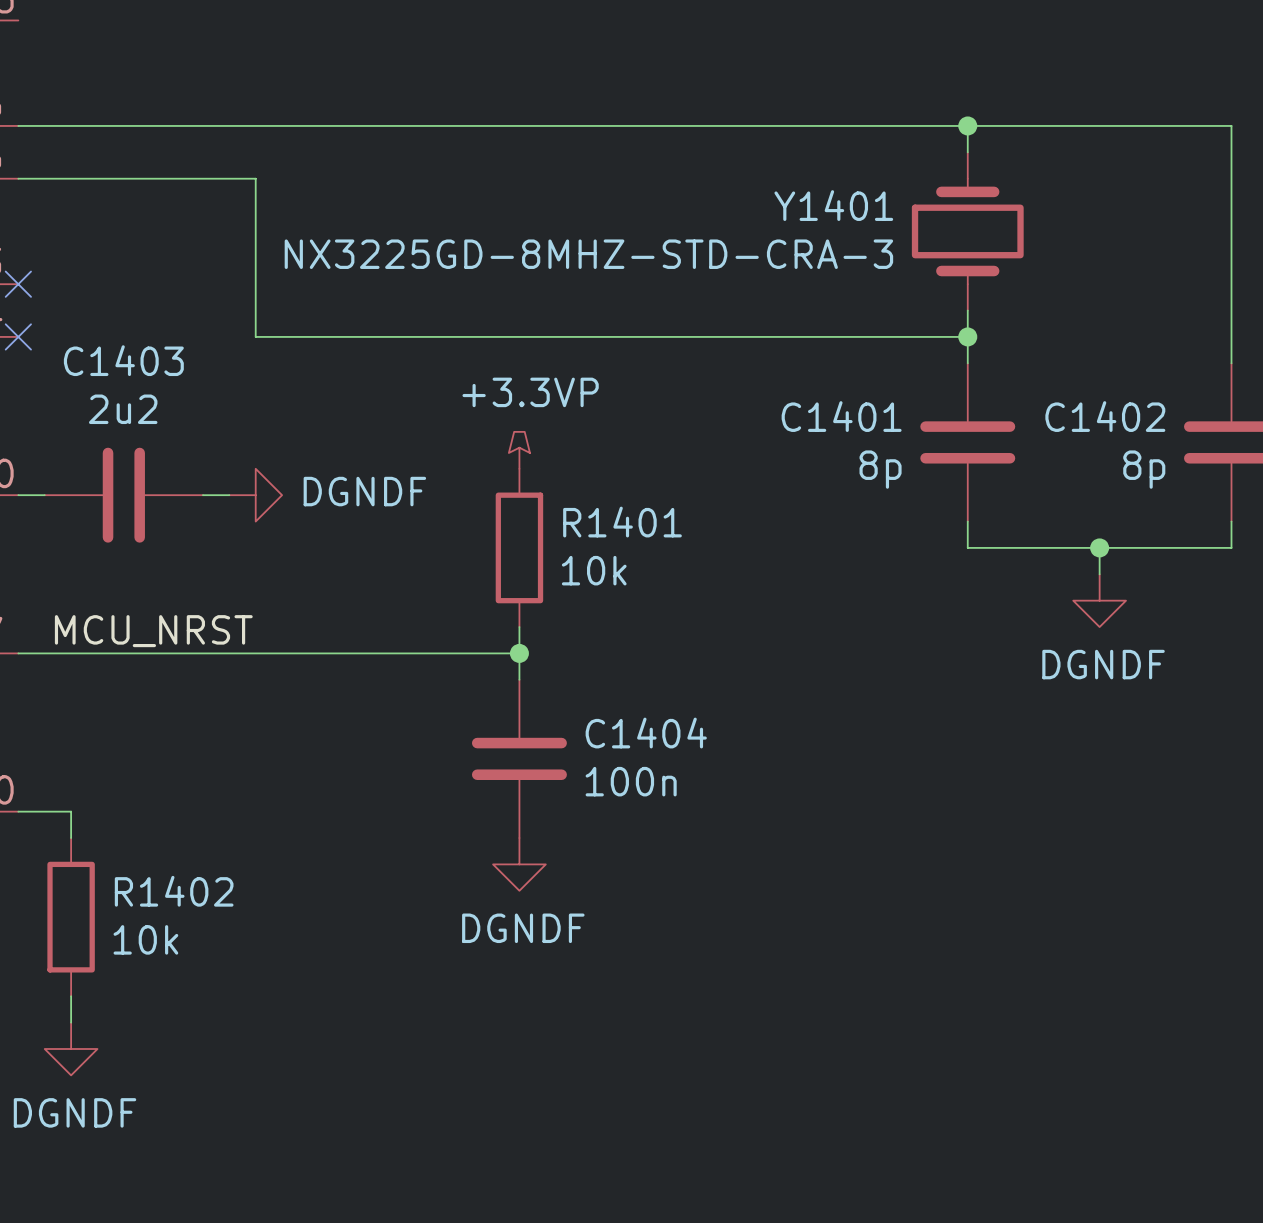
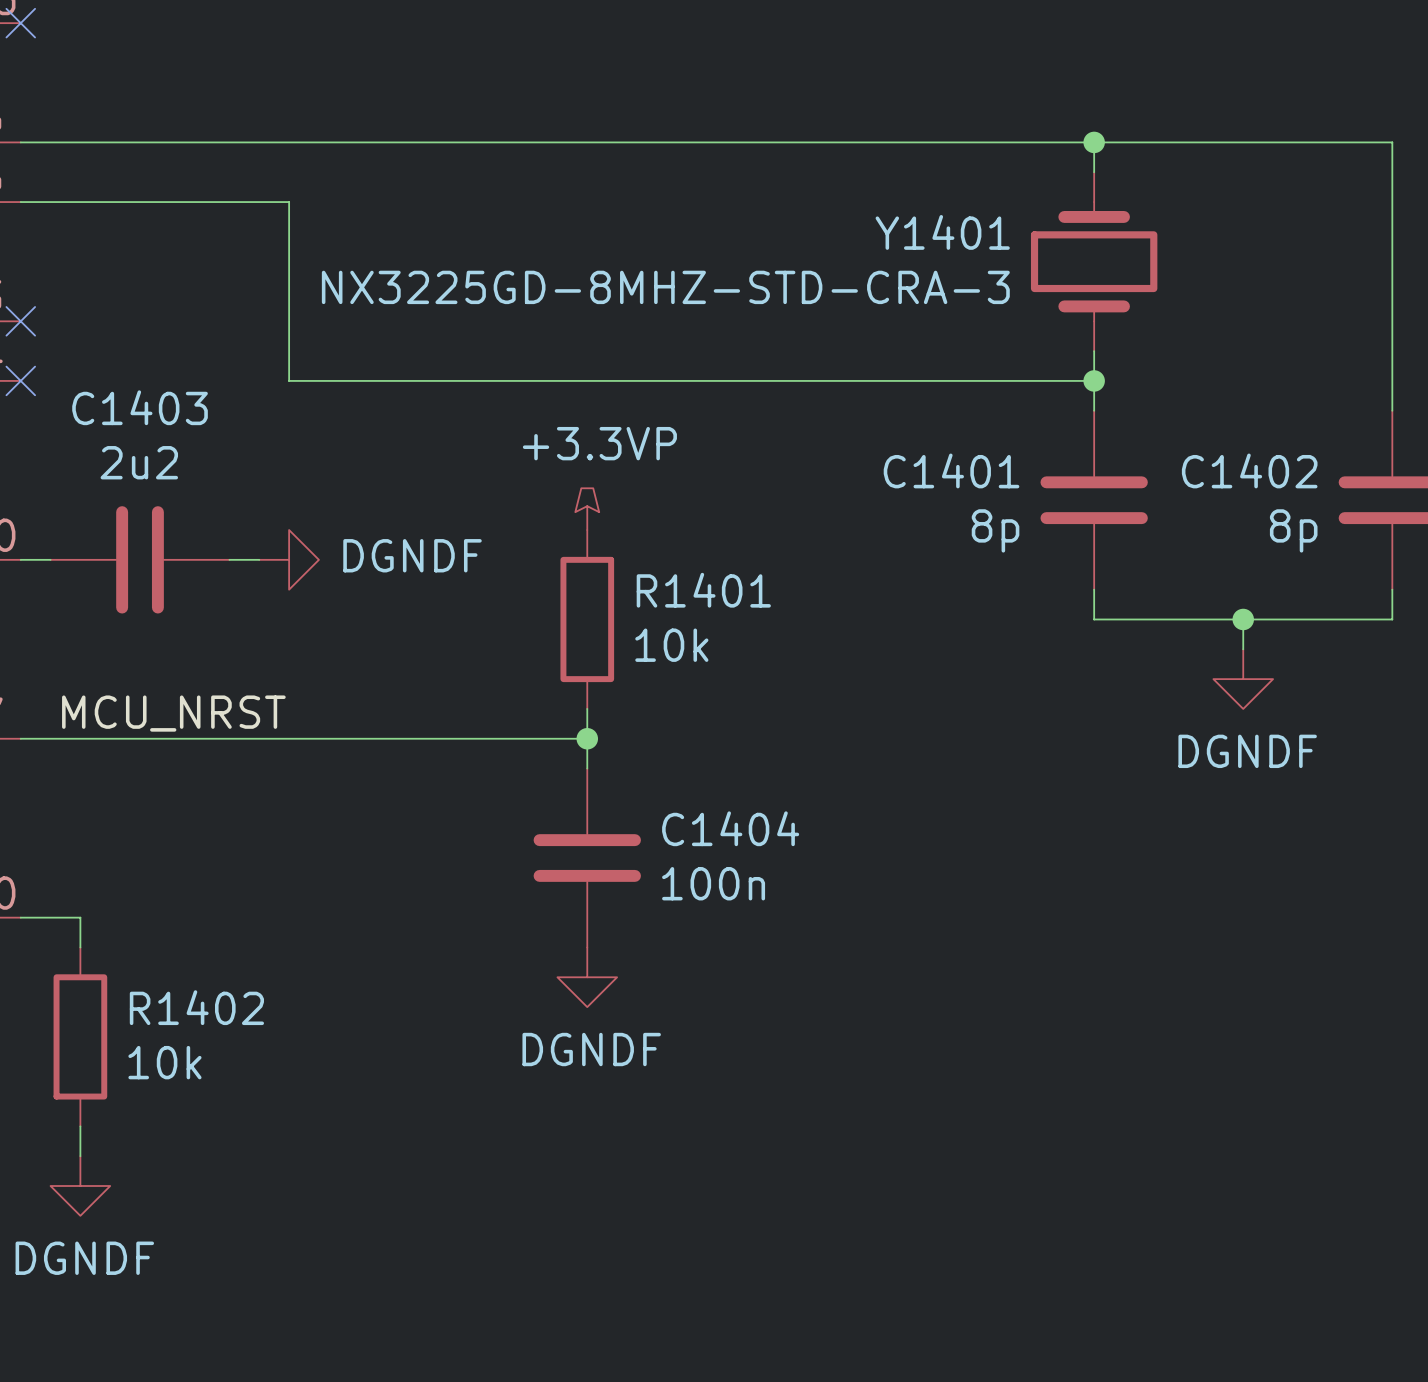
no-connect mark: none -> (20, 23)

